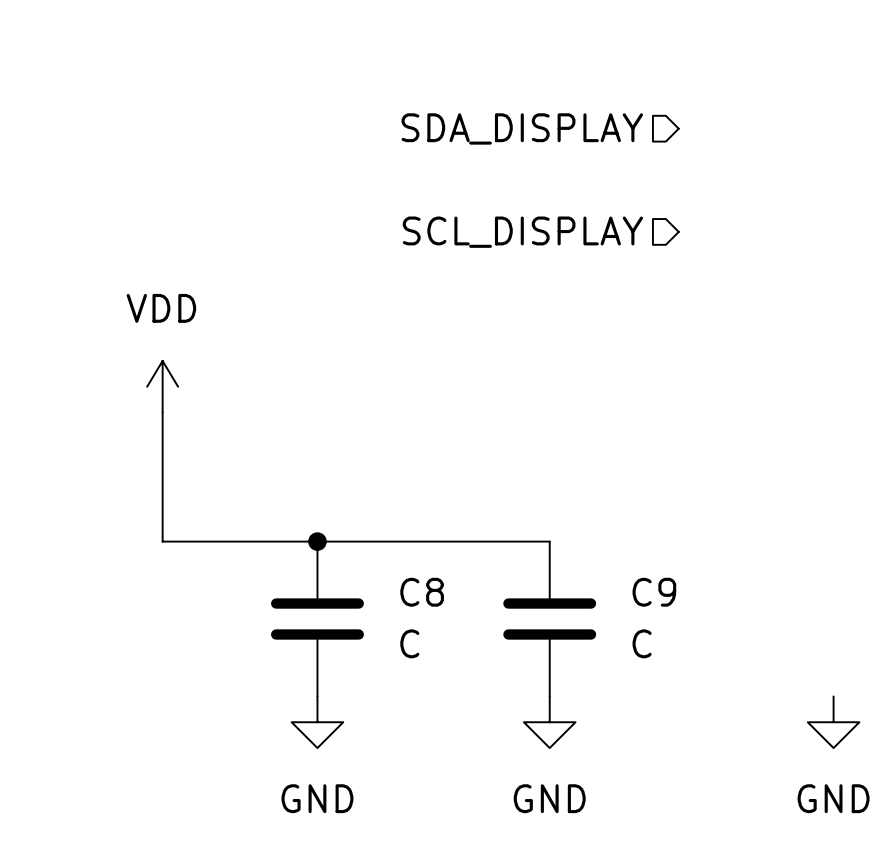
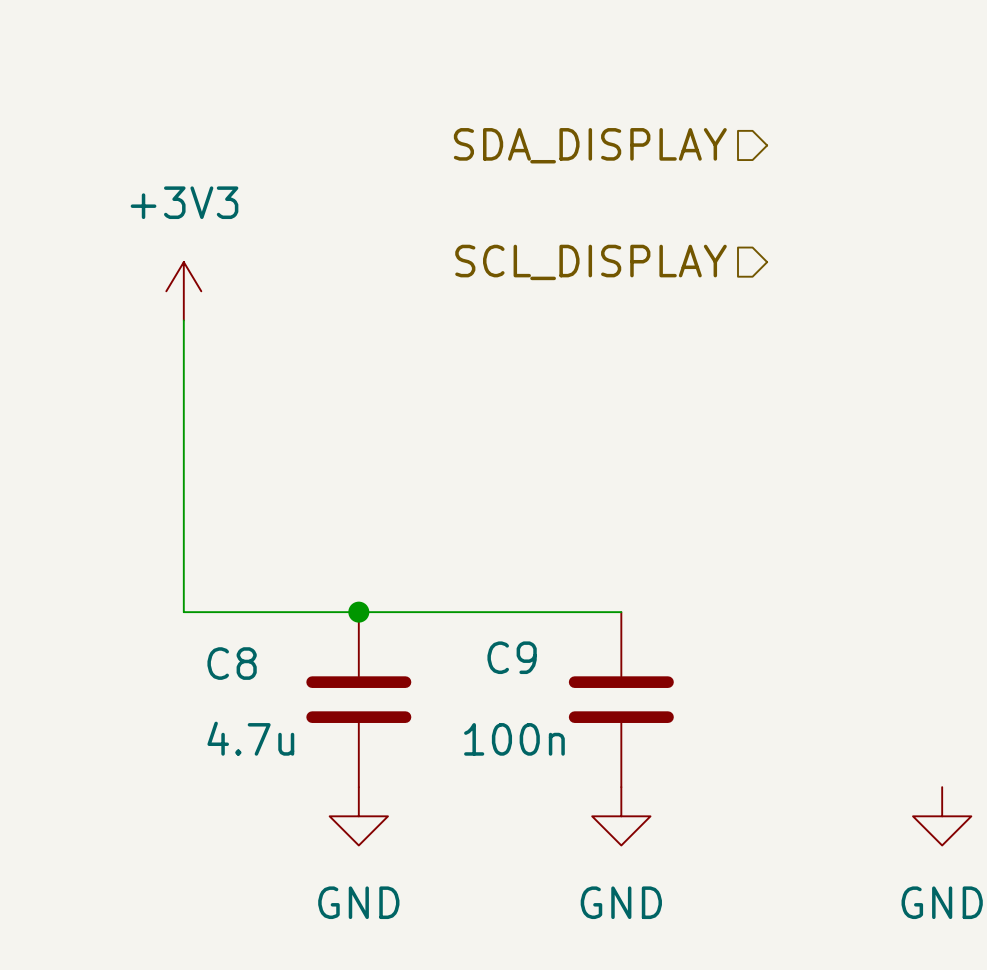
power symbol: none -> +3V3 (183, 291)
wire: none -> (183, 320) (183, 466)
power symbol: VDD (162, 386) -> none
C8 name position: C8 (422, 592) -> C8 (232, 663)
C9 name position: C9 (654, 592) -> C9 (512, 657)
C8 value: C (409, 643) -> 4.7u (250, 738)
C9 value: C (642, 643) -> 100n (514, 739)

